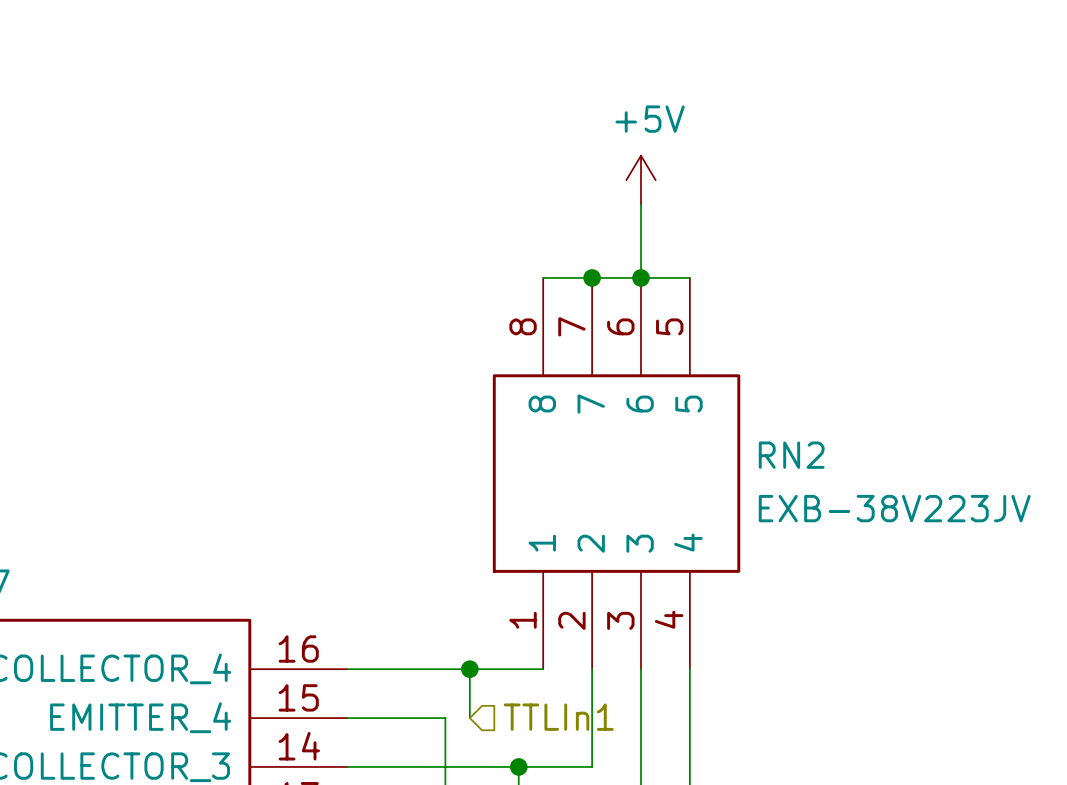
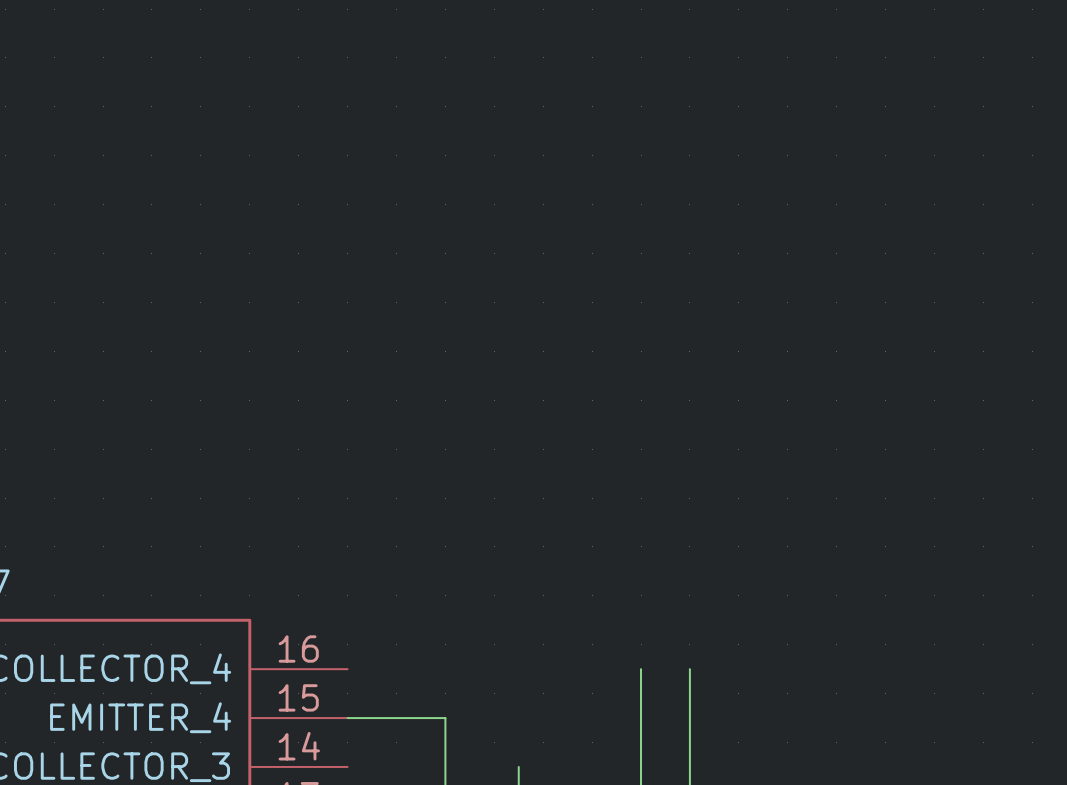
power symbol: +5V (641, 180) -> none
wire: (641, 204) (641, 277) -> none
wire: (543, 277) (689, 277) -> none
junction: (592, 277) -> none
junction: (641, 277) -> none
RN2: EXB-38V223JV (616, 473) -> none
wire: (347, 669) (543, 669) -> none
wire: (469, 669) (469, 718) -> none
junction: (469, 669) -> none
wire: (592, 669) (592, 766) (347, 766) -> none
hierarchical label: TTLIn1 (558, 717) -> none
junction: (518, 766) -> none

